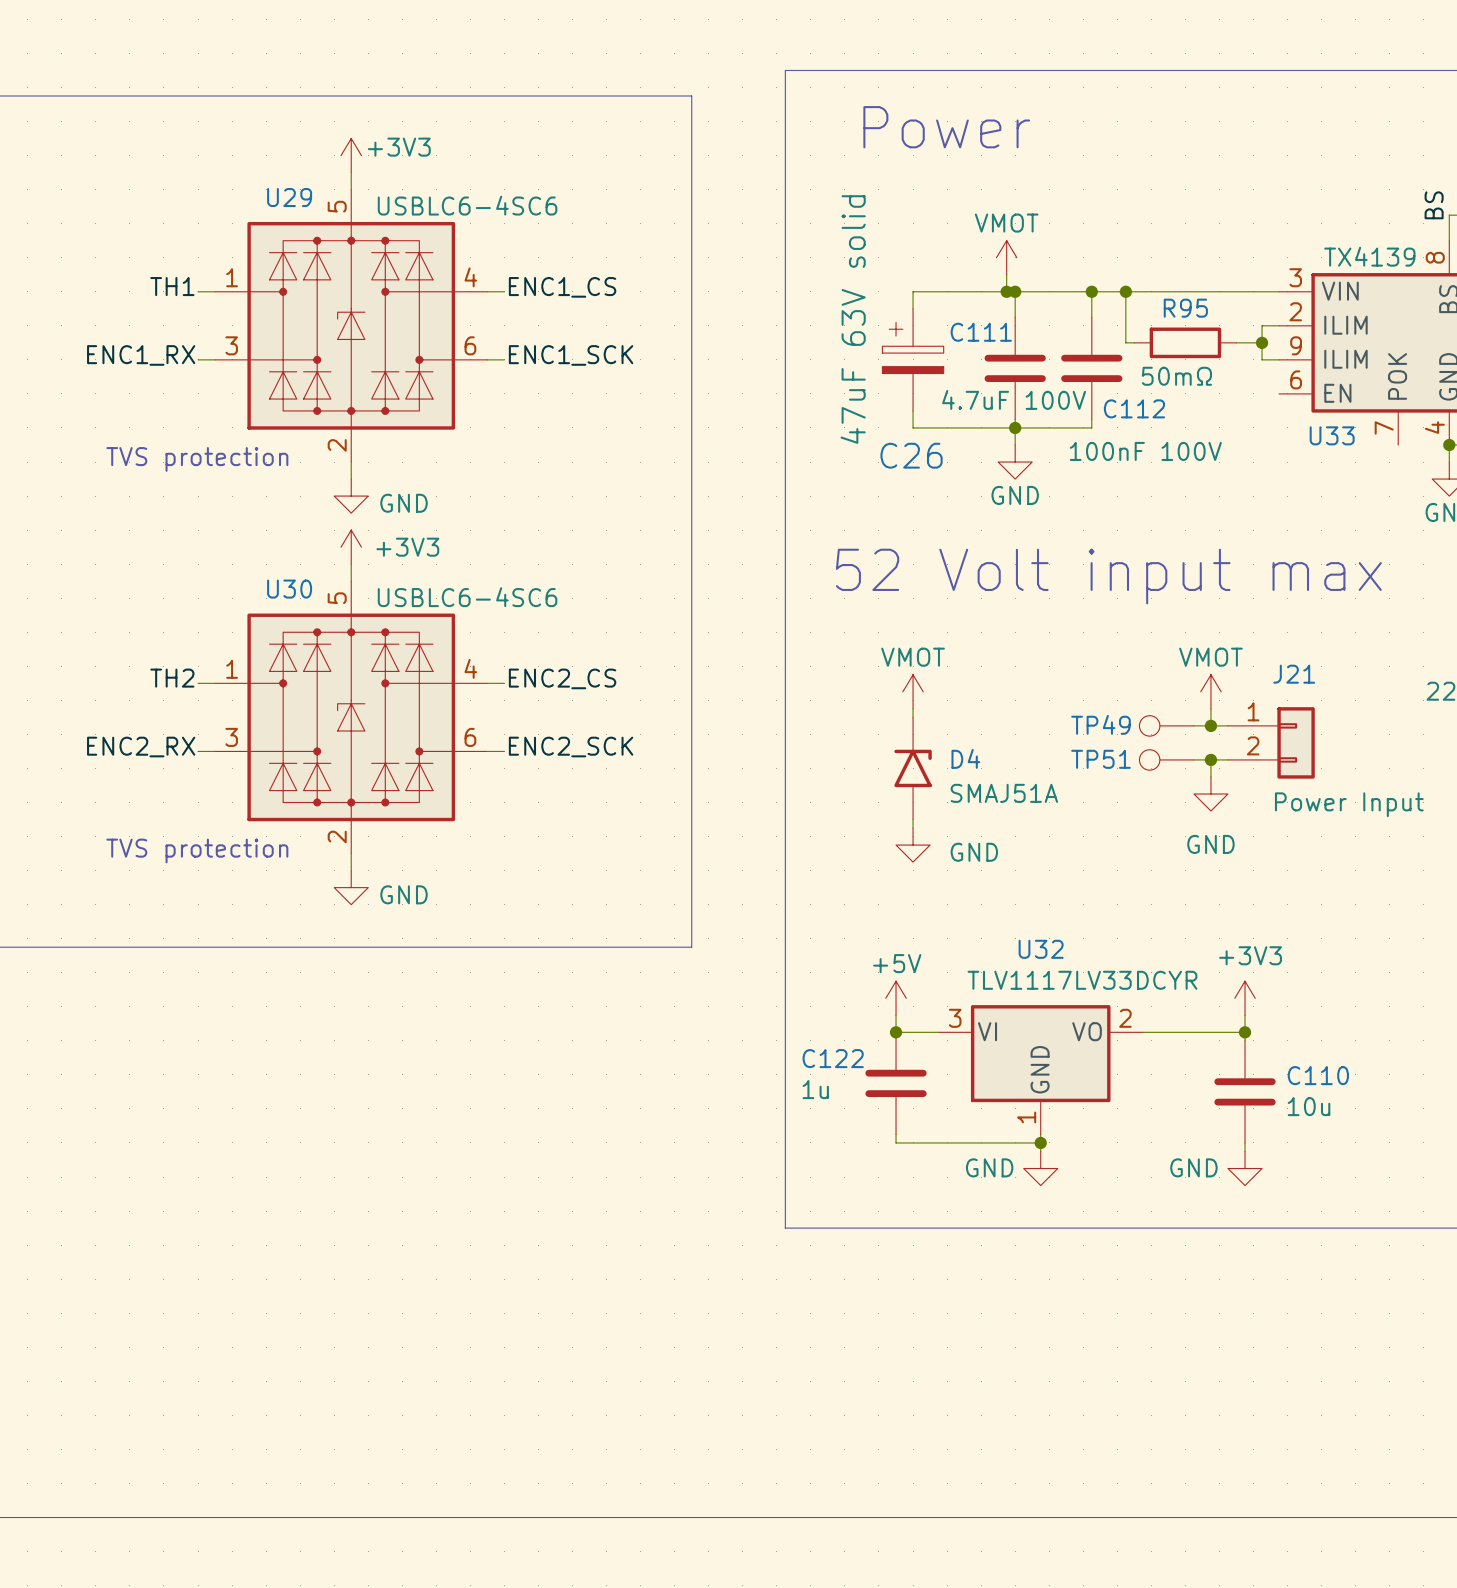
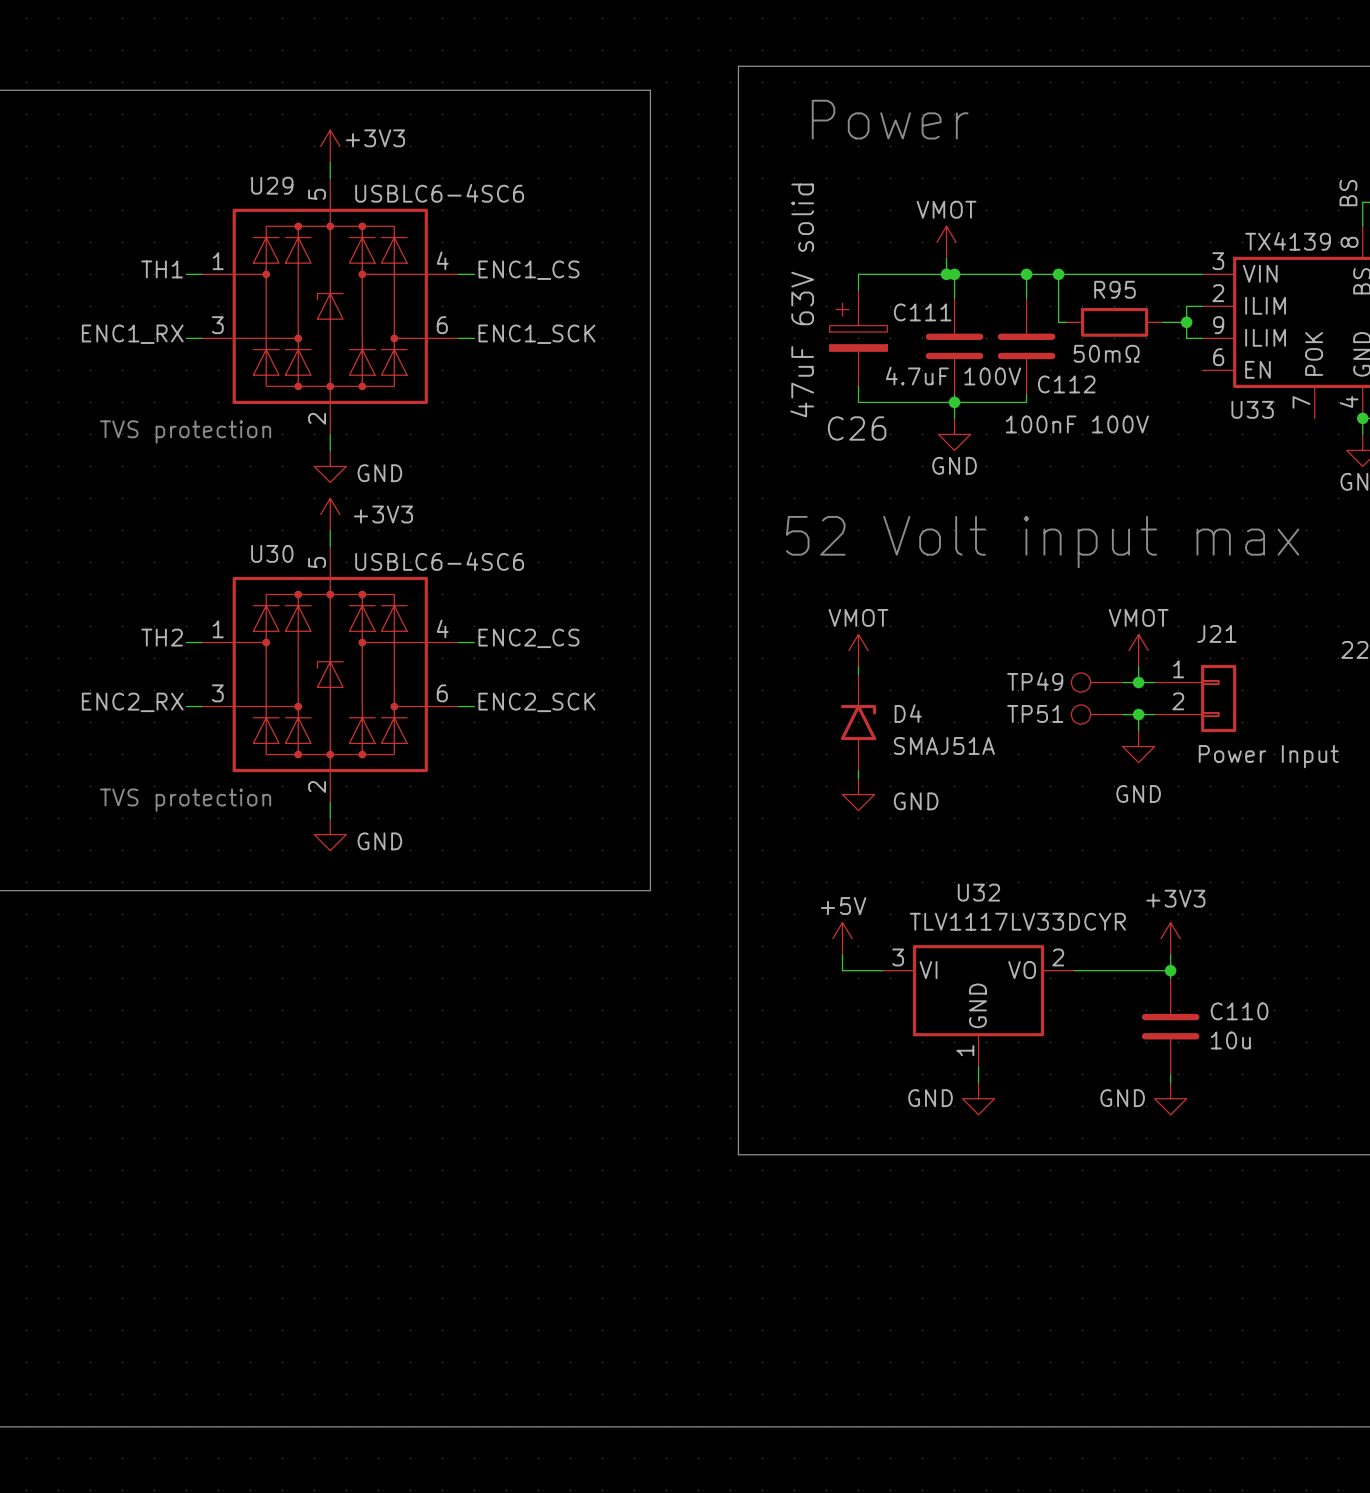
junction: (896, 1032) -> none
C122: 1u (896, 1083) -> none
wire: (896, 1134) (896, 1142) (1040, 1142) -> none
junction: (1040, 1142) -> none

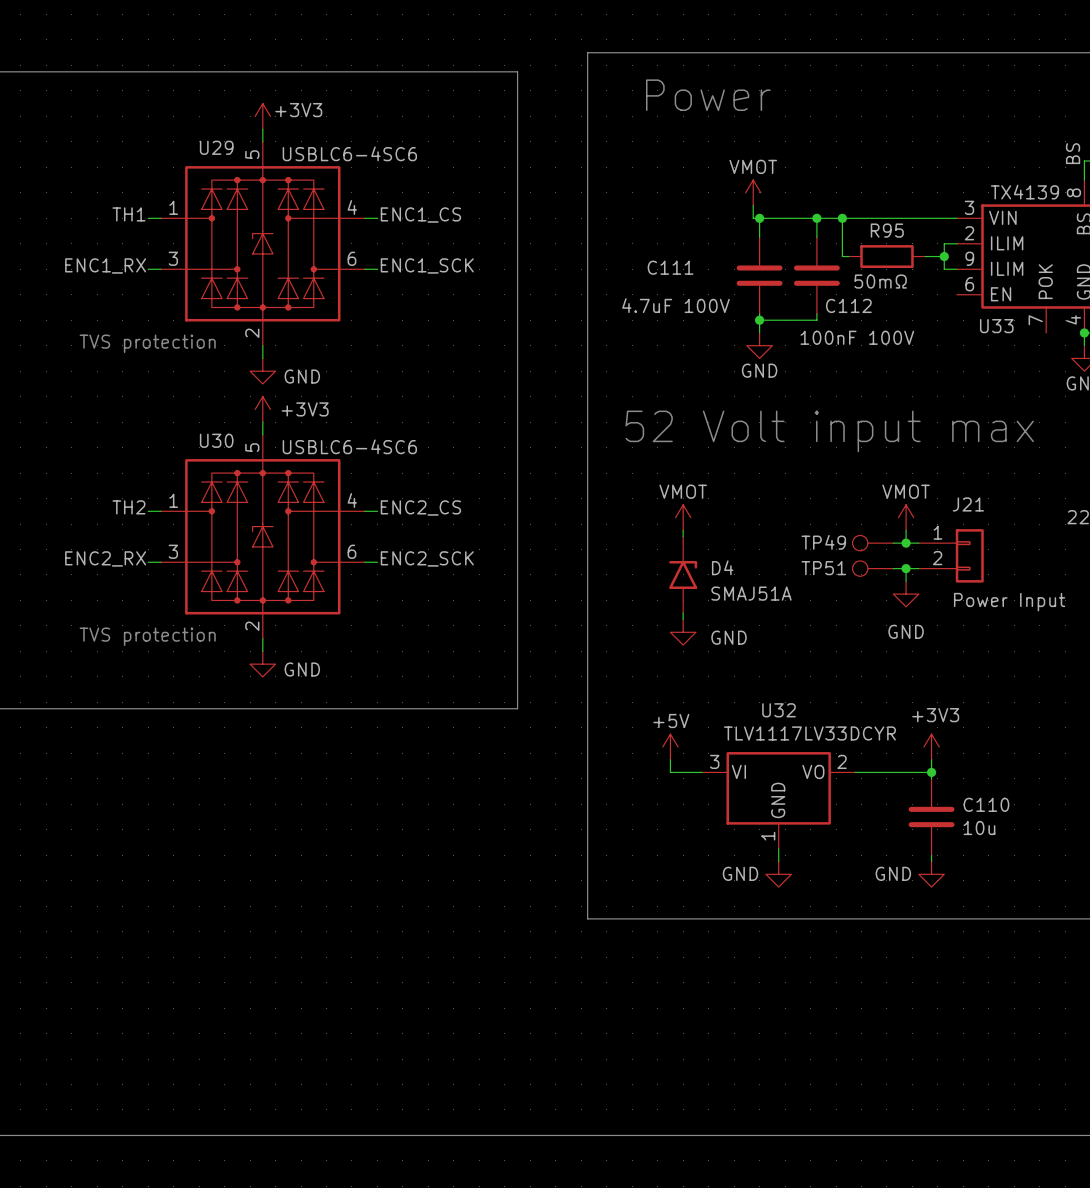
wire: (946, 274) (858, 274) (858, 290) -> none
junction: (946, 274) -> none
C111 name position: C111 (922, 312) -> C111 (670, 267)
C26: 47uF 63V solid (858, 338) -> none
C111 value position: 4.7uF 100V (953, 376) -> 4.7uF 100V (675, 305)
wire: (858, 386) (858, 402) (954, 402) -> none

